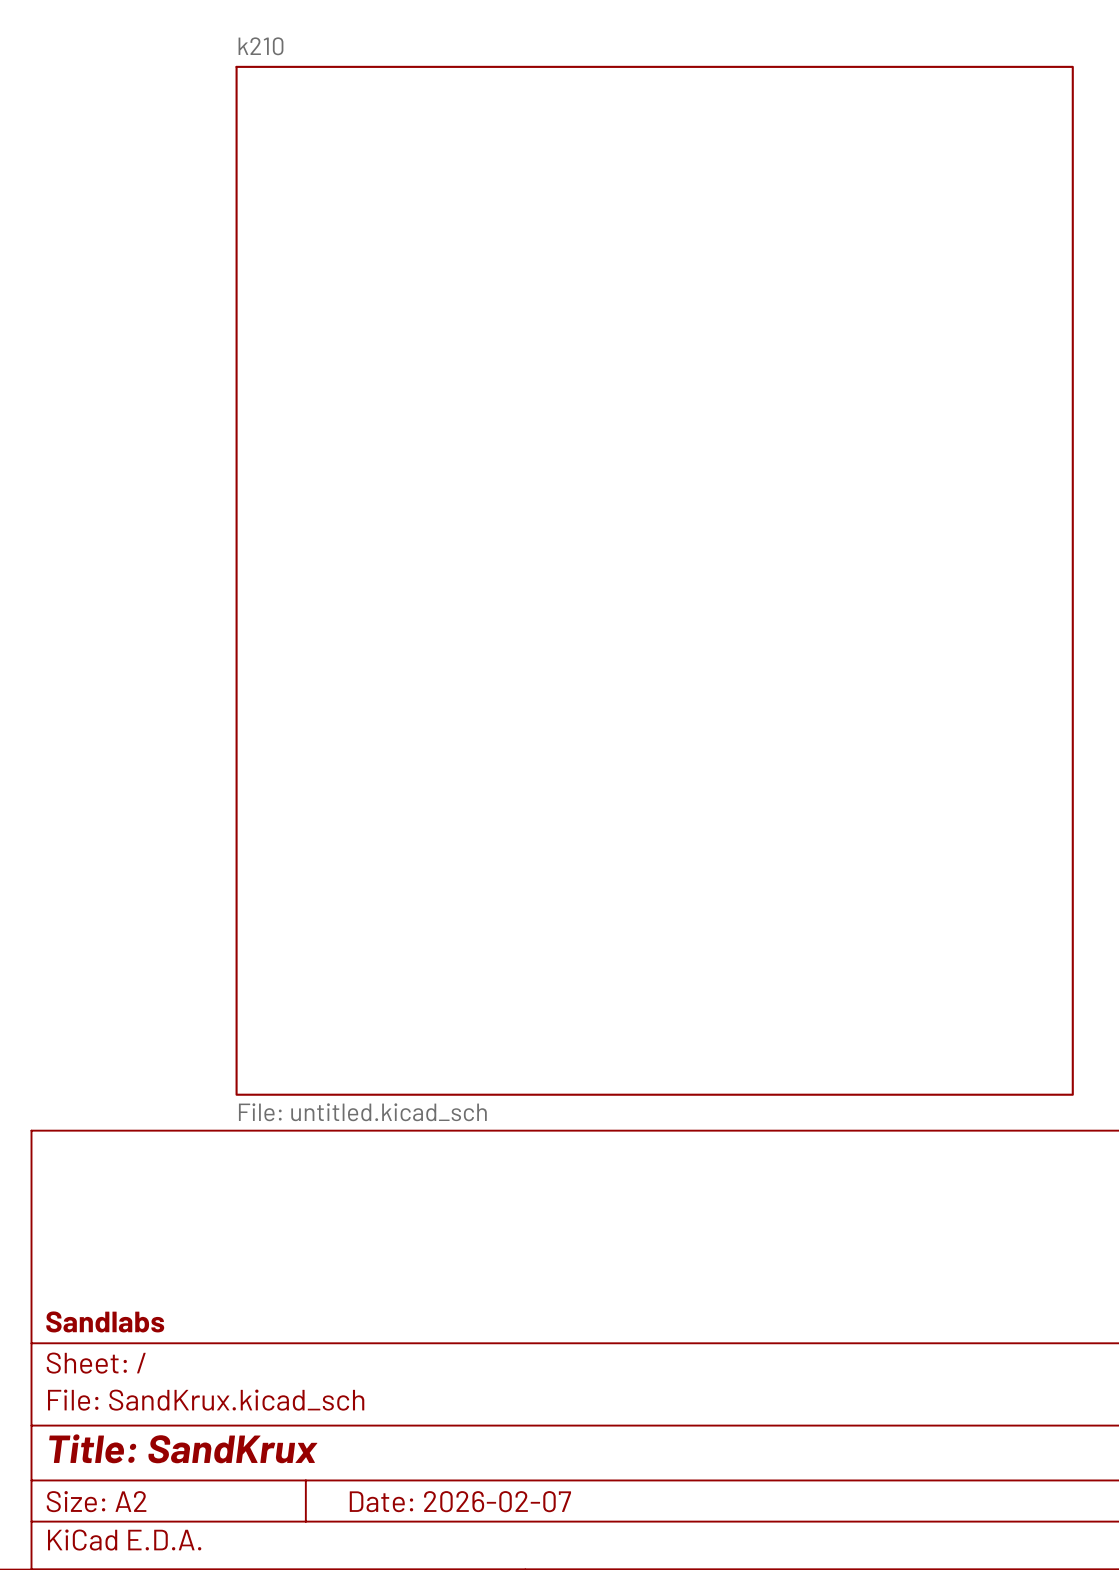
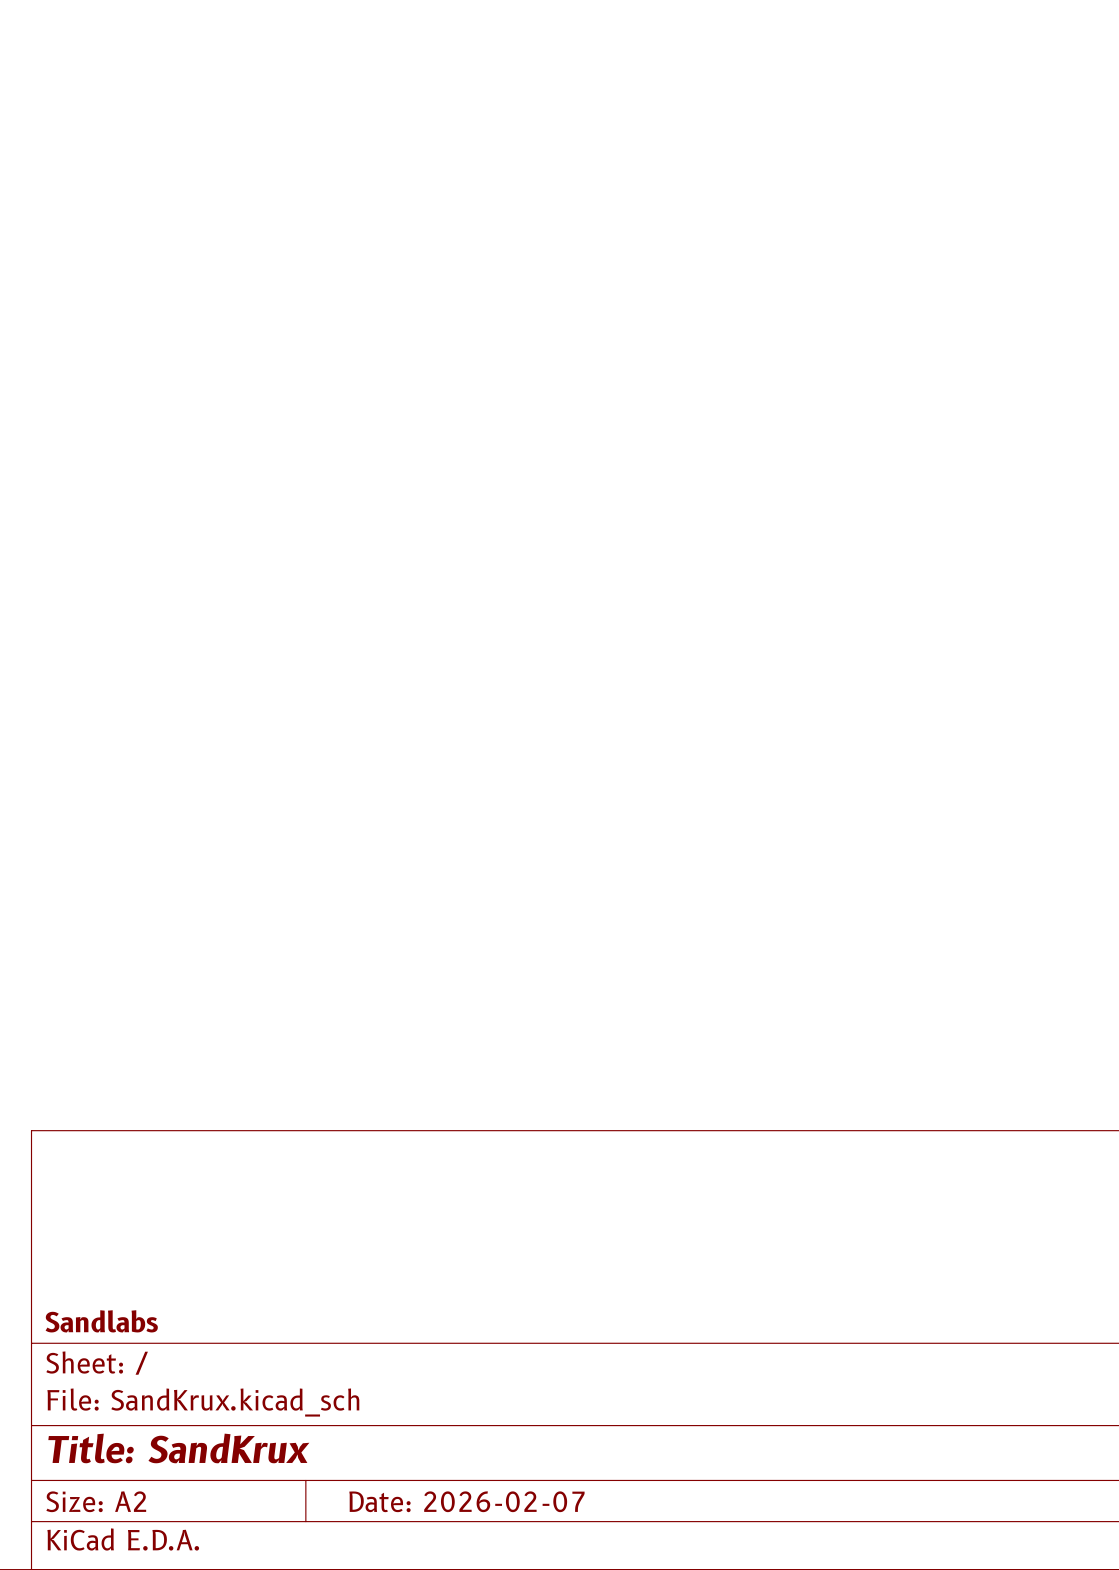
sheet k210: File: untitled.kicad_sch (654, 580) -> none

